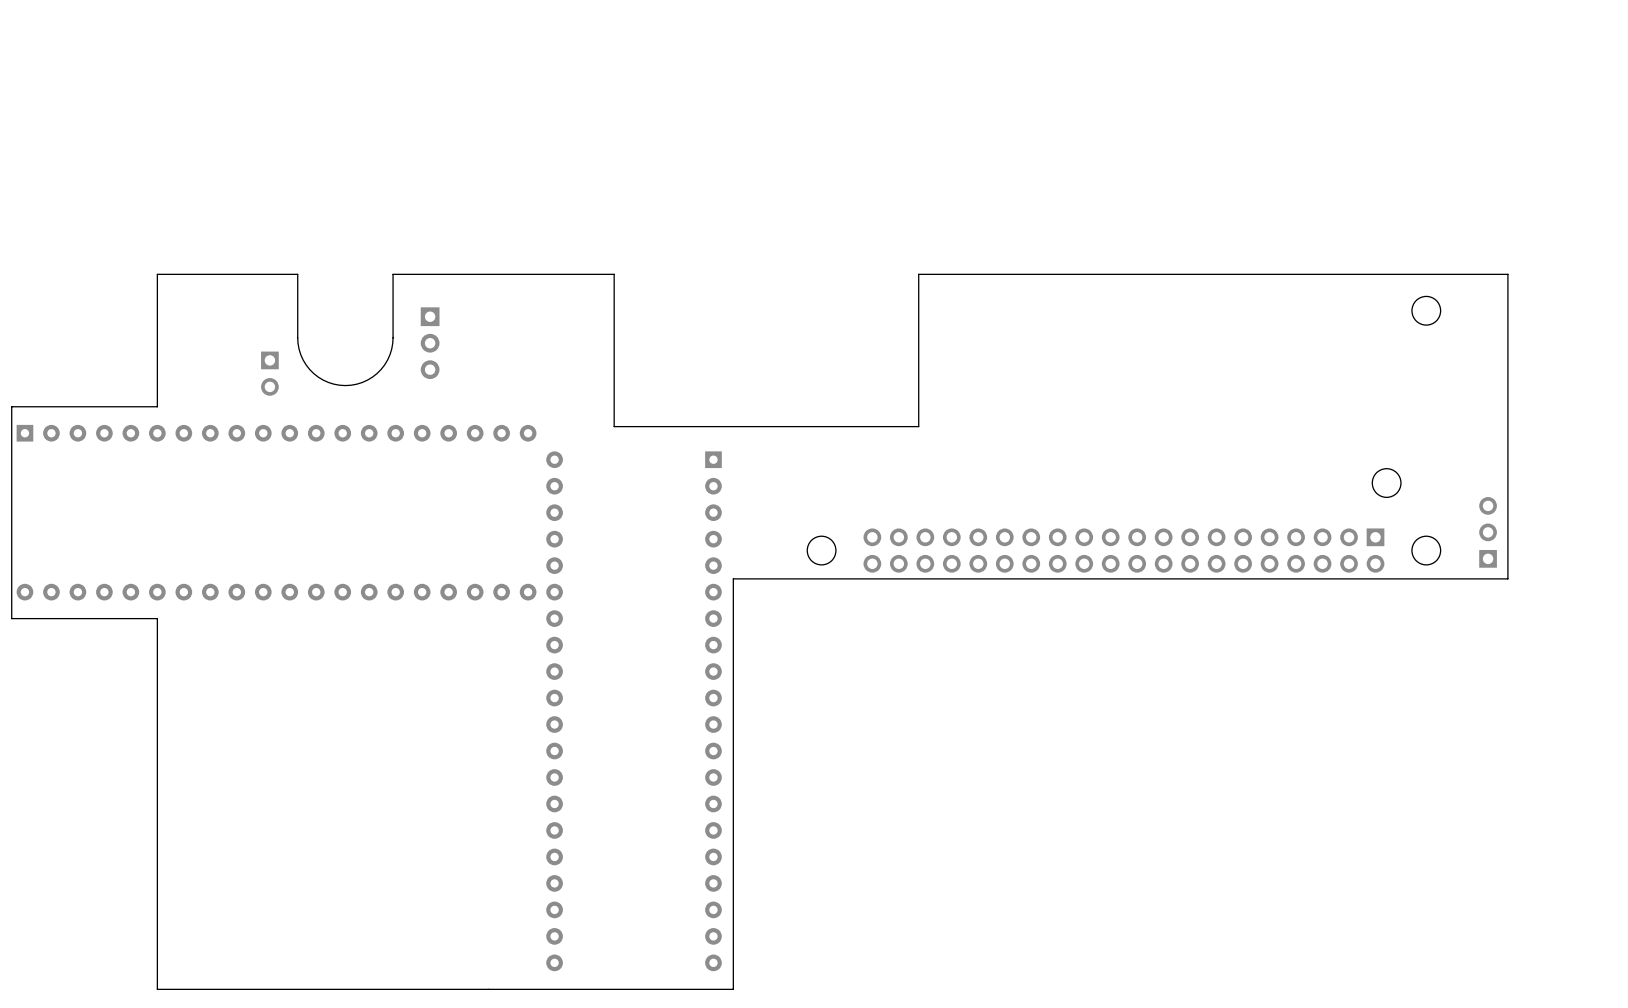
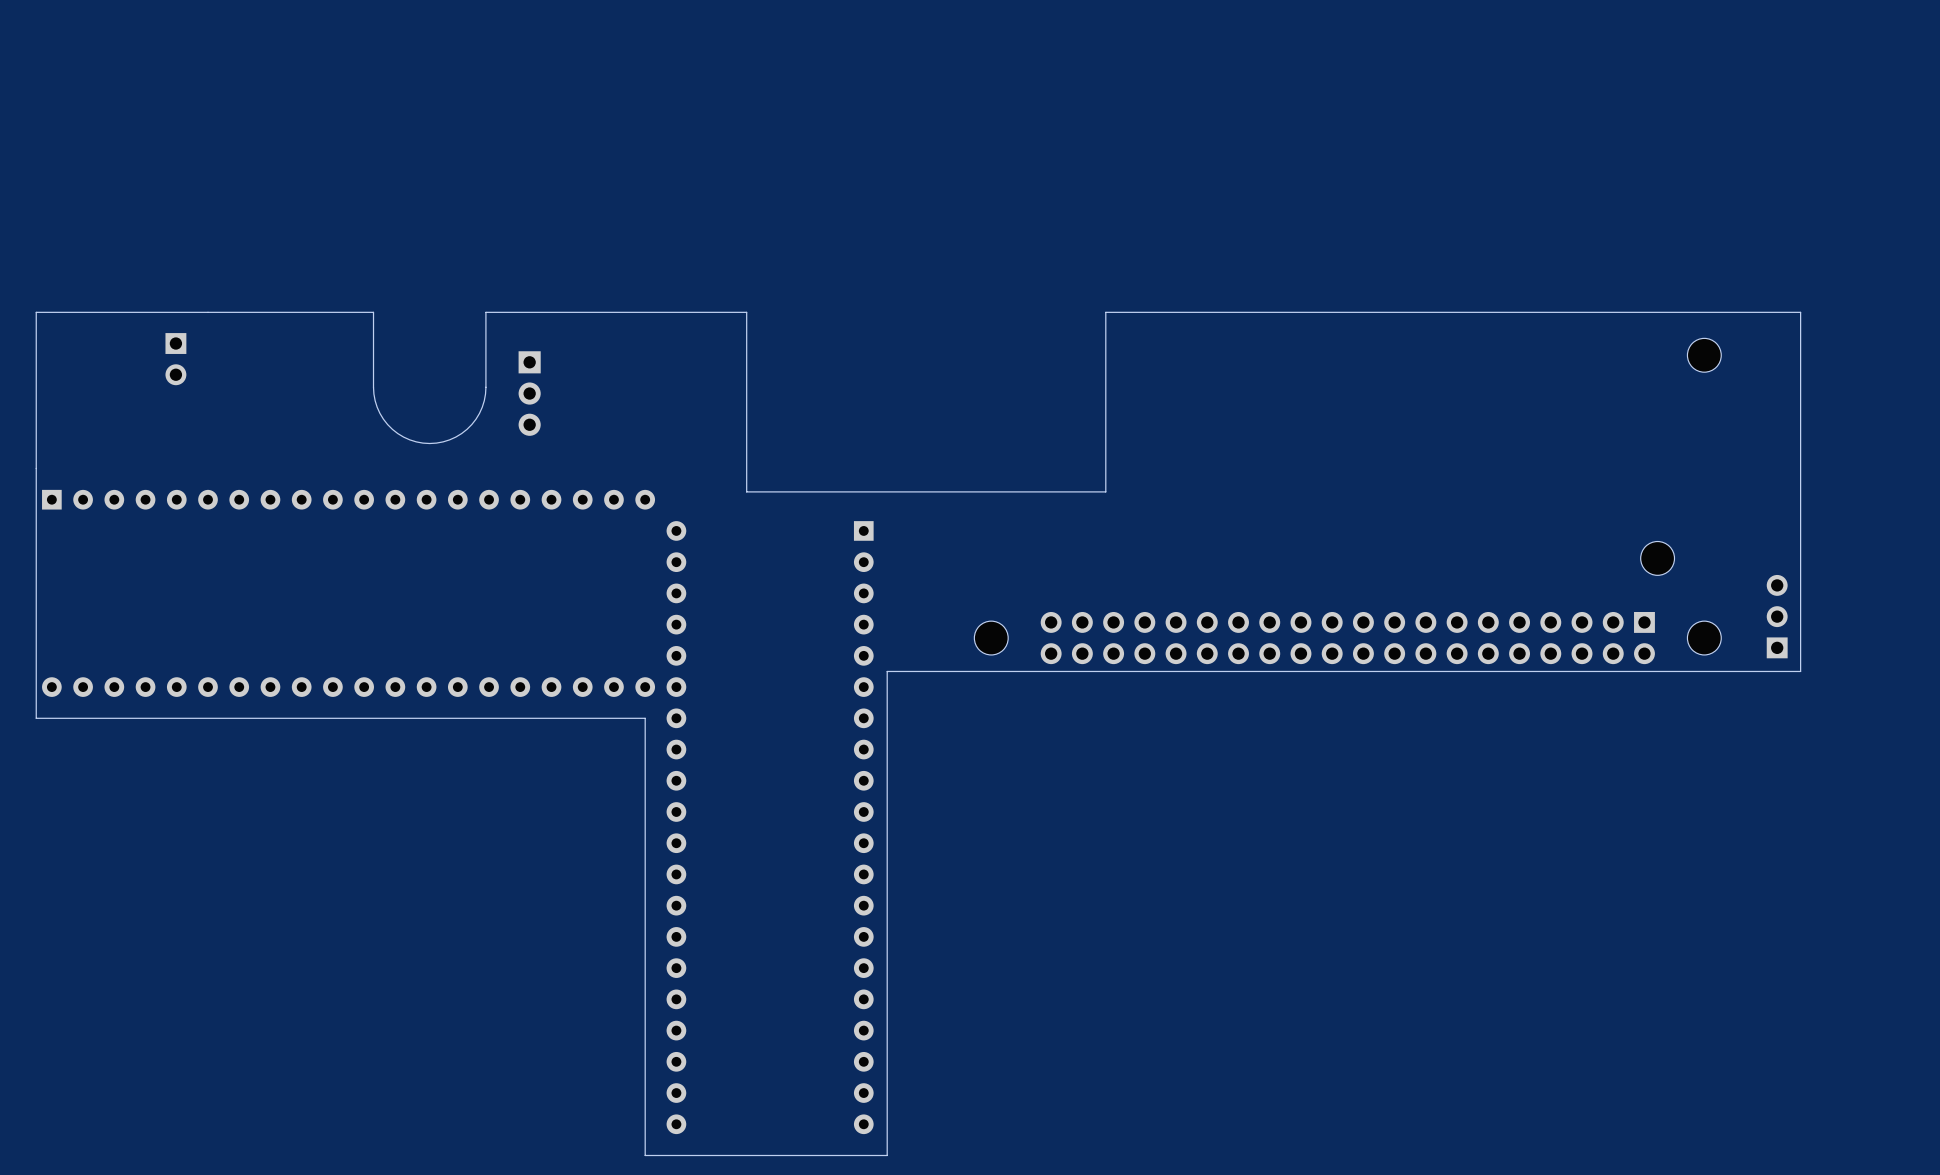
board edge: (157, 274) (157, 406) (11, 406) -> (208, 312) (36, 312) (36, 468)
part position: (269, 373) -> (175, 359)
board edge: (157, 618) (157, 989) (528, 989) -> (208, 718) (645, 718) (645, 1155)

